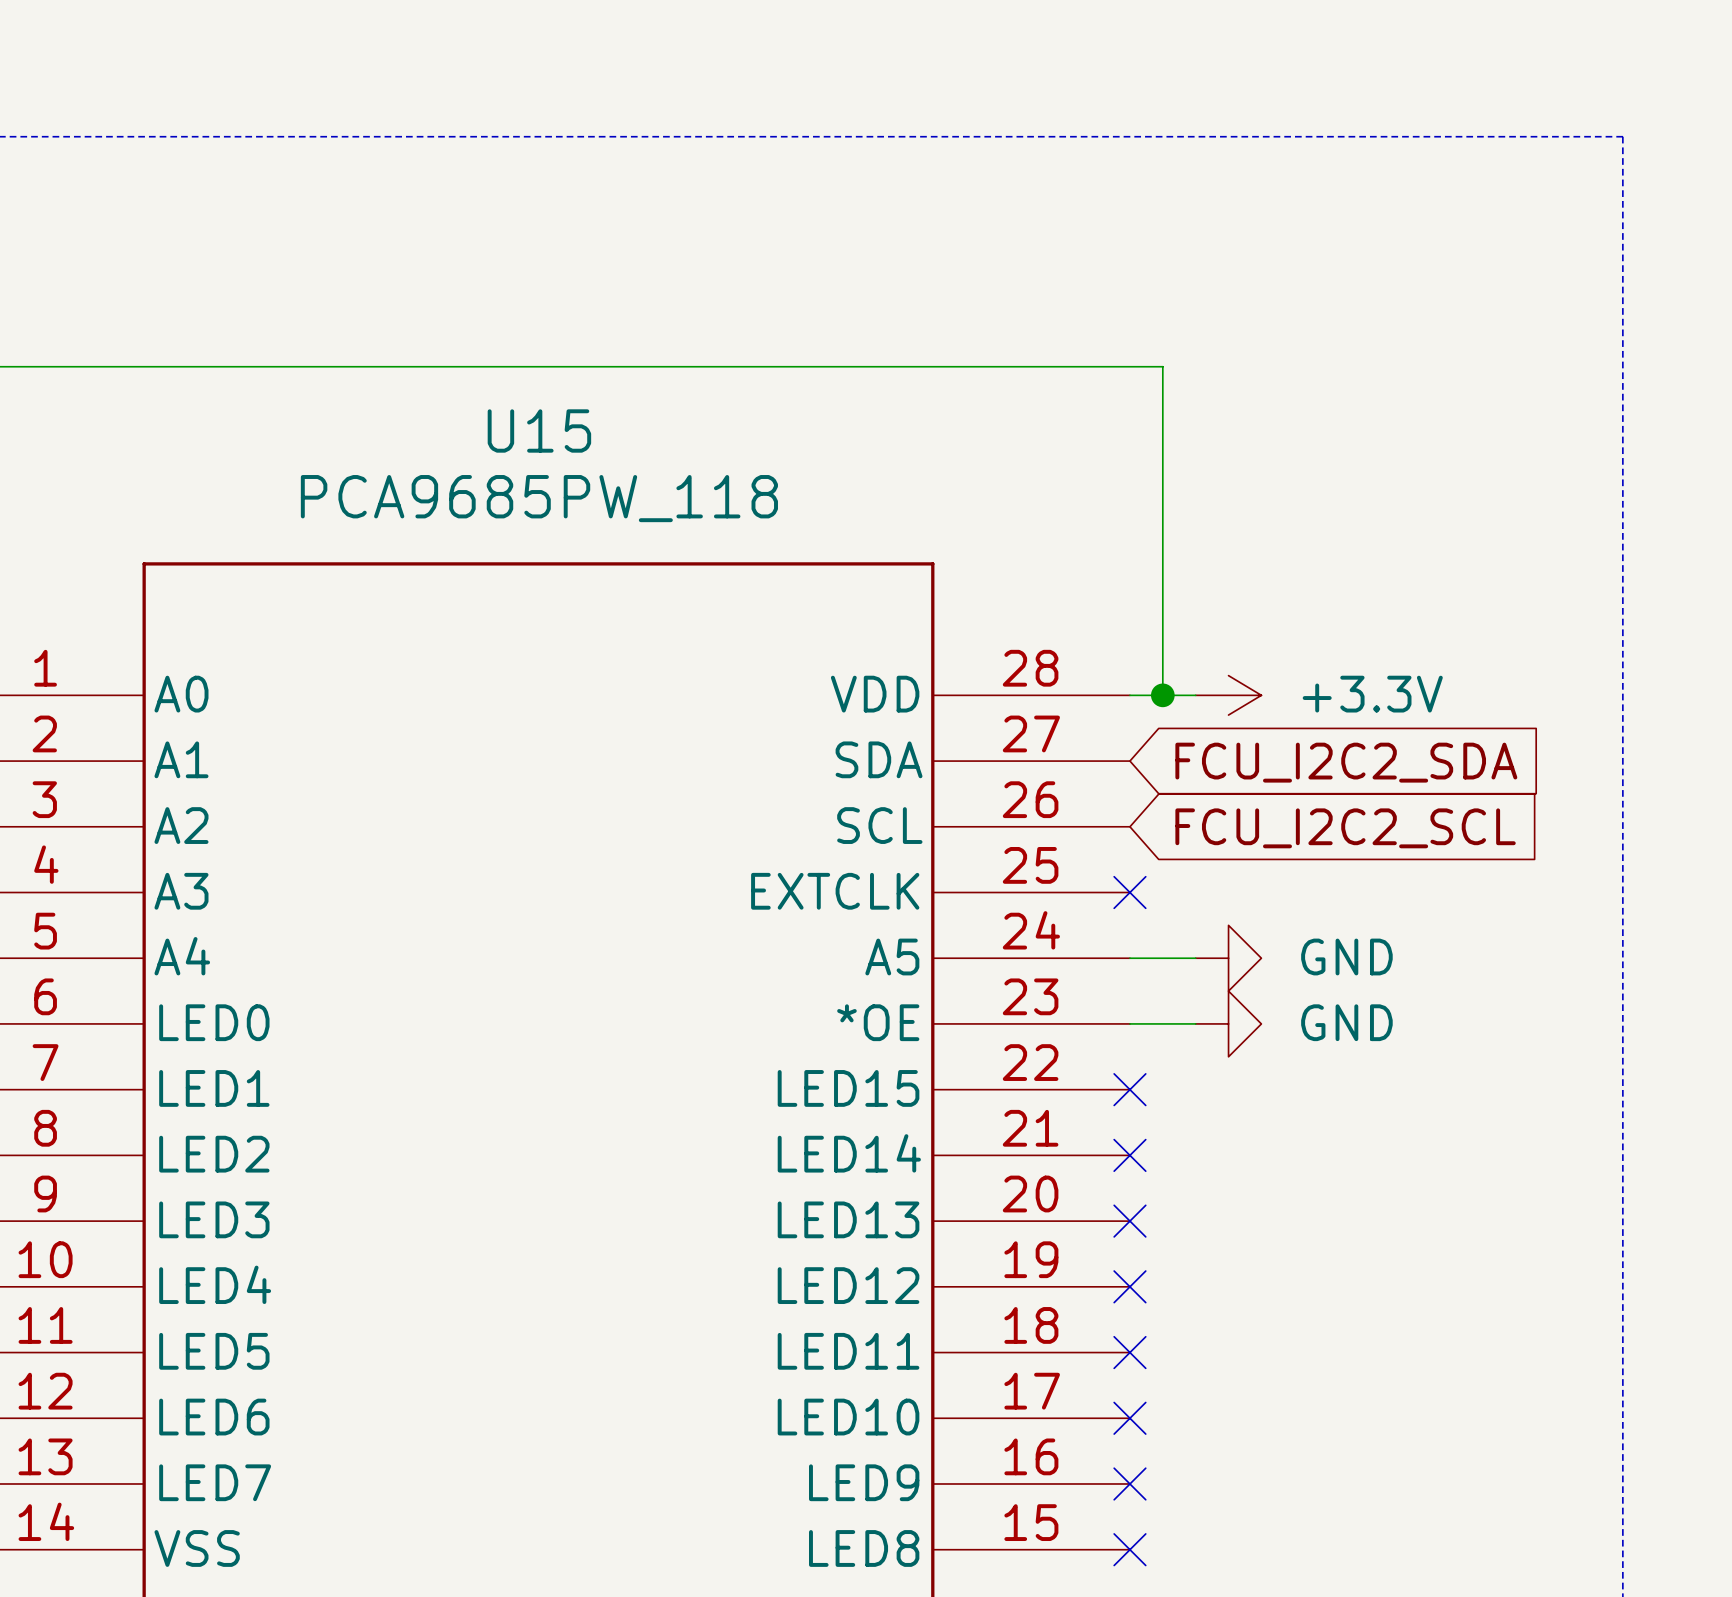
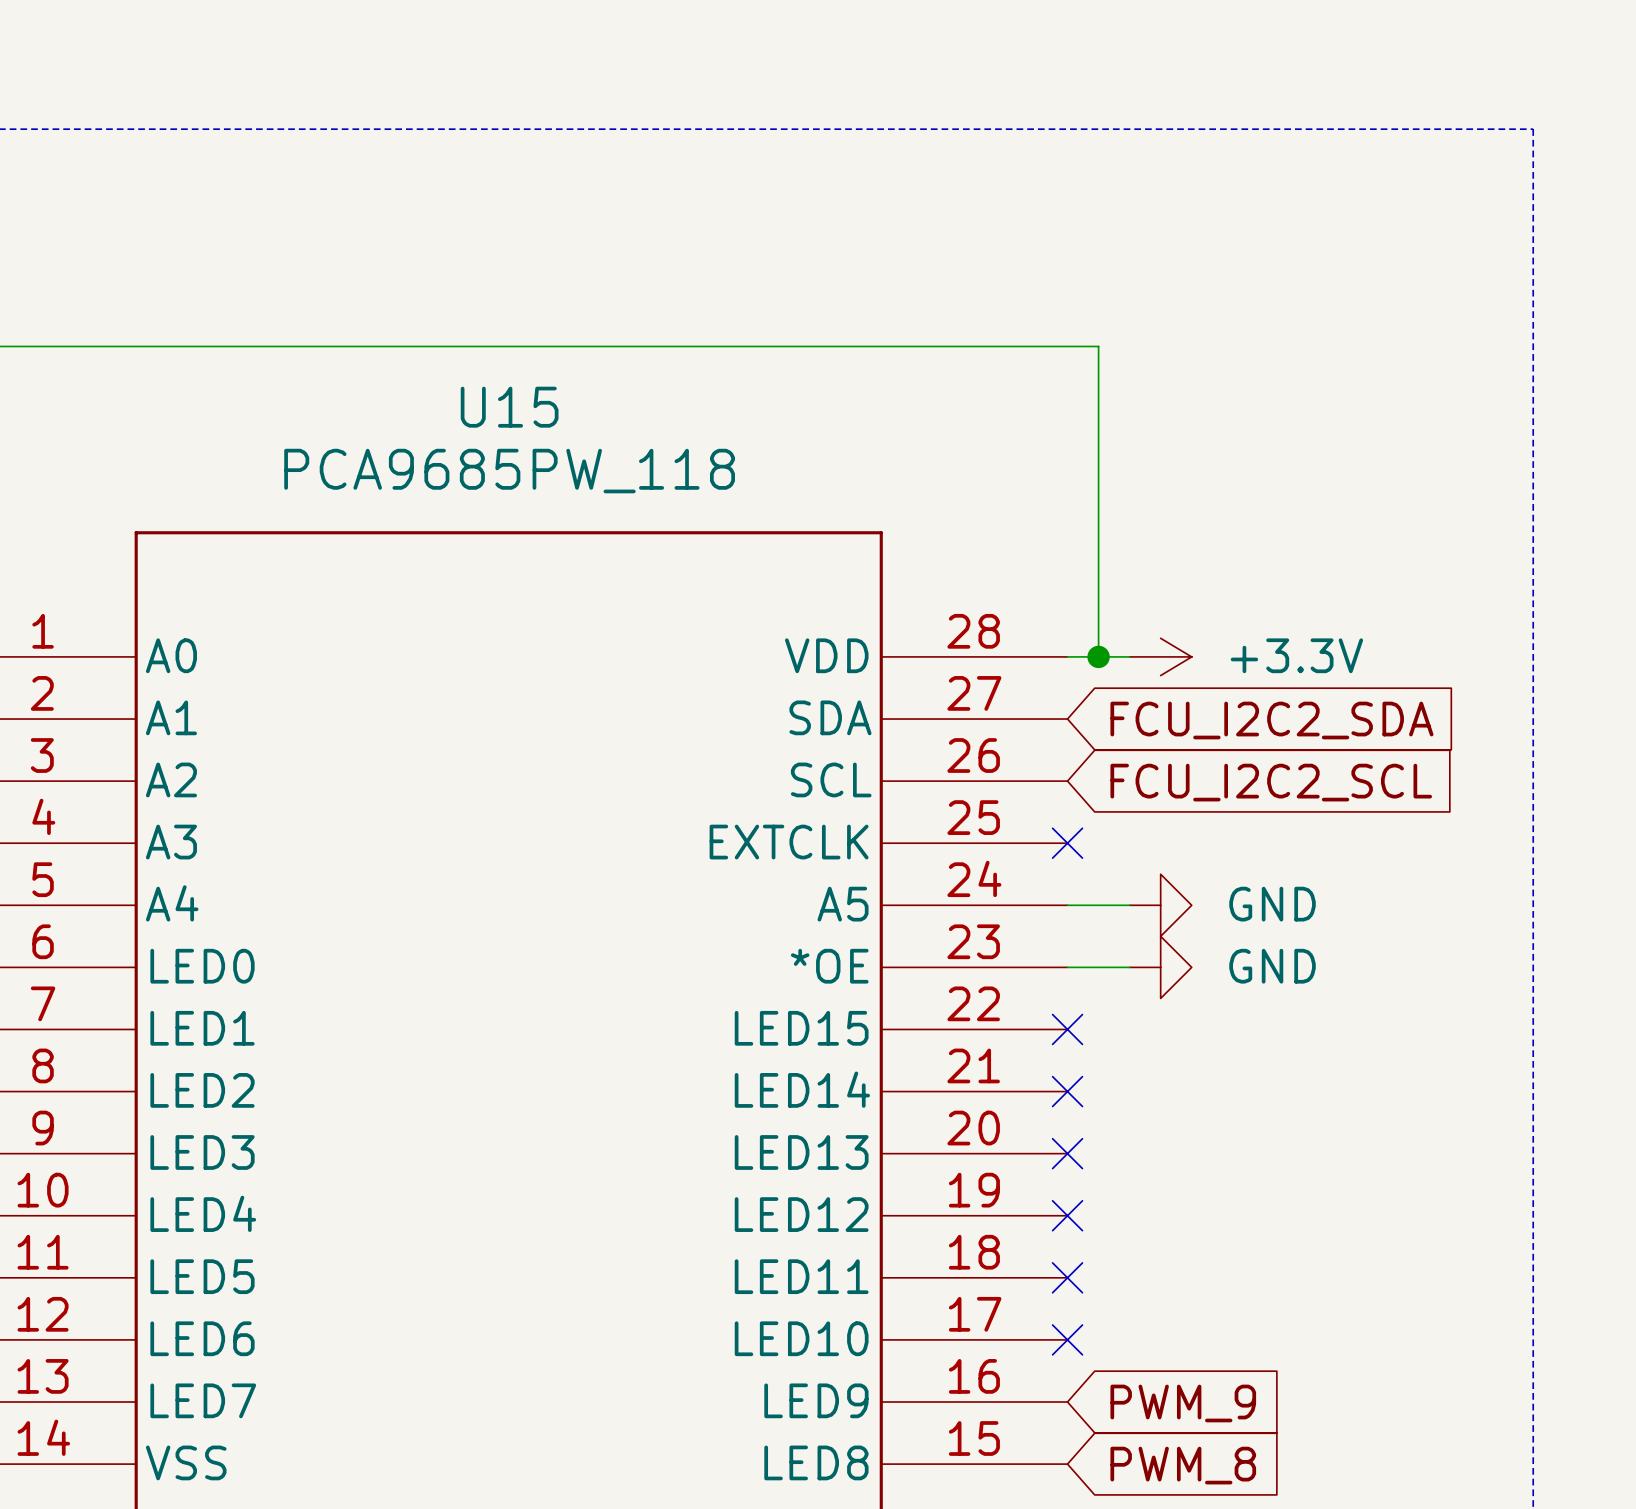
no-connect mark: (1129, 1483) -> none
global label: none -> PWM_9 (1183, 1403)
no-connect mark: (1129, 1549) -> none
global label: none -> PWM_8 (1183, 1465)

